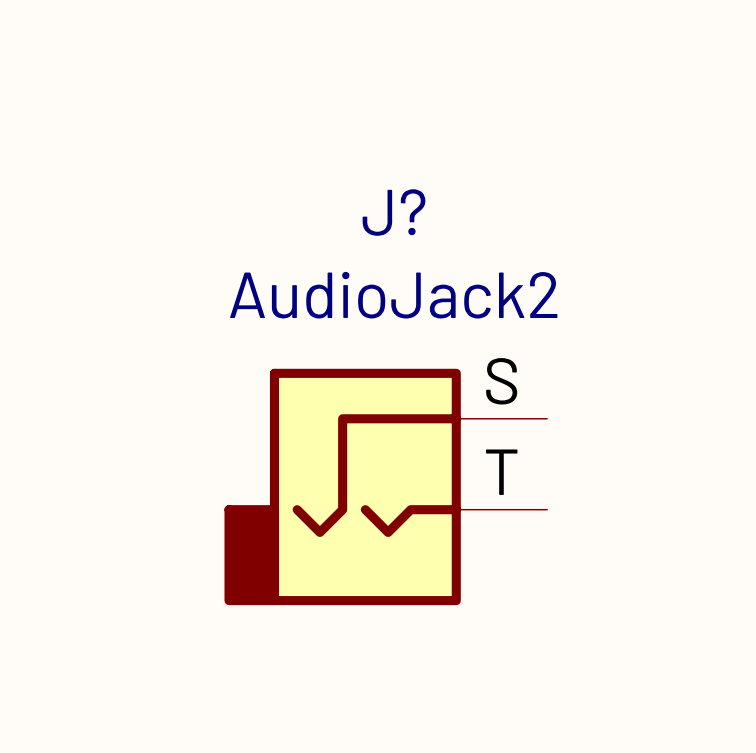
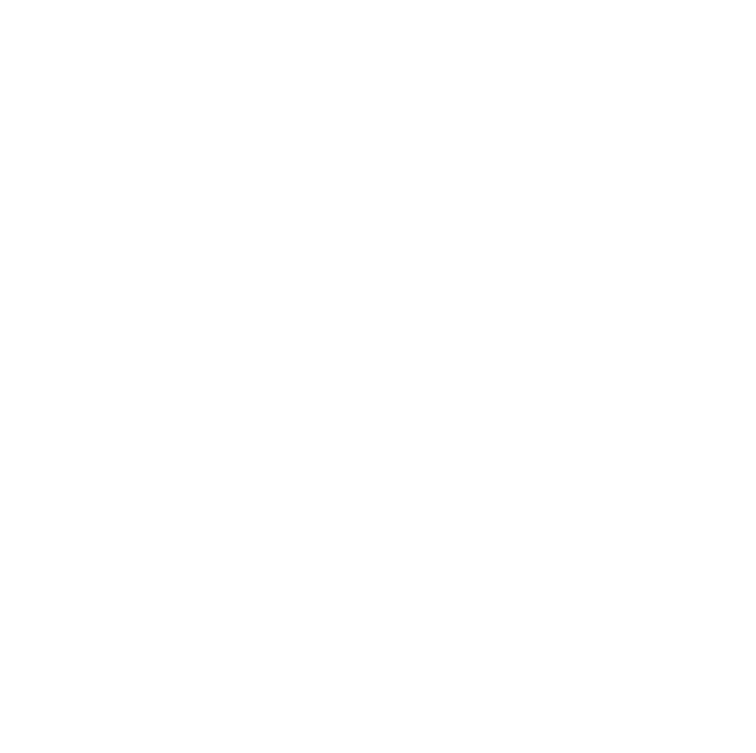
J?: AudioJack2 (385, 486) -> none

